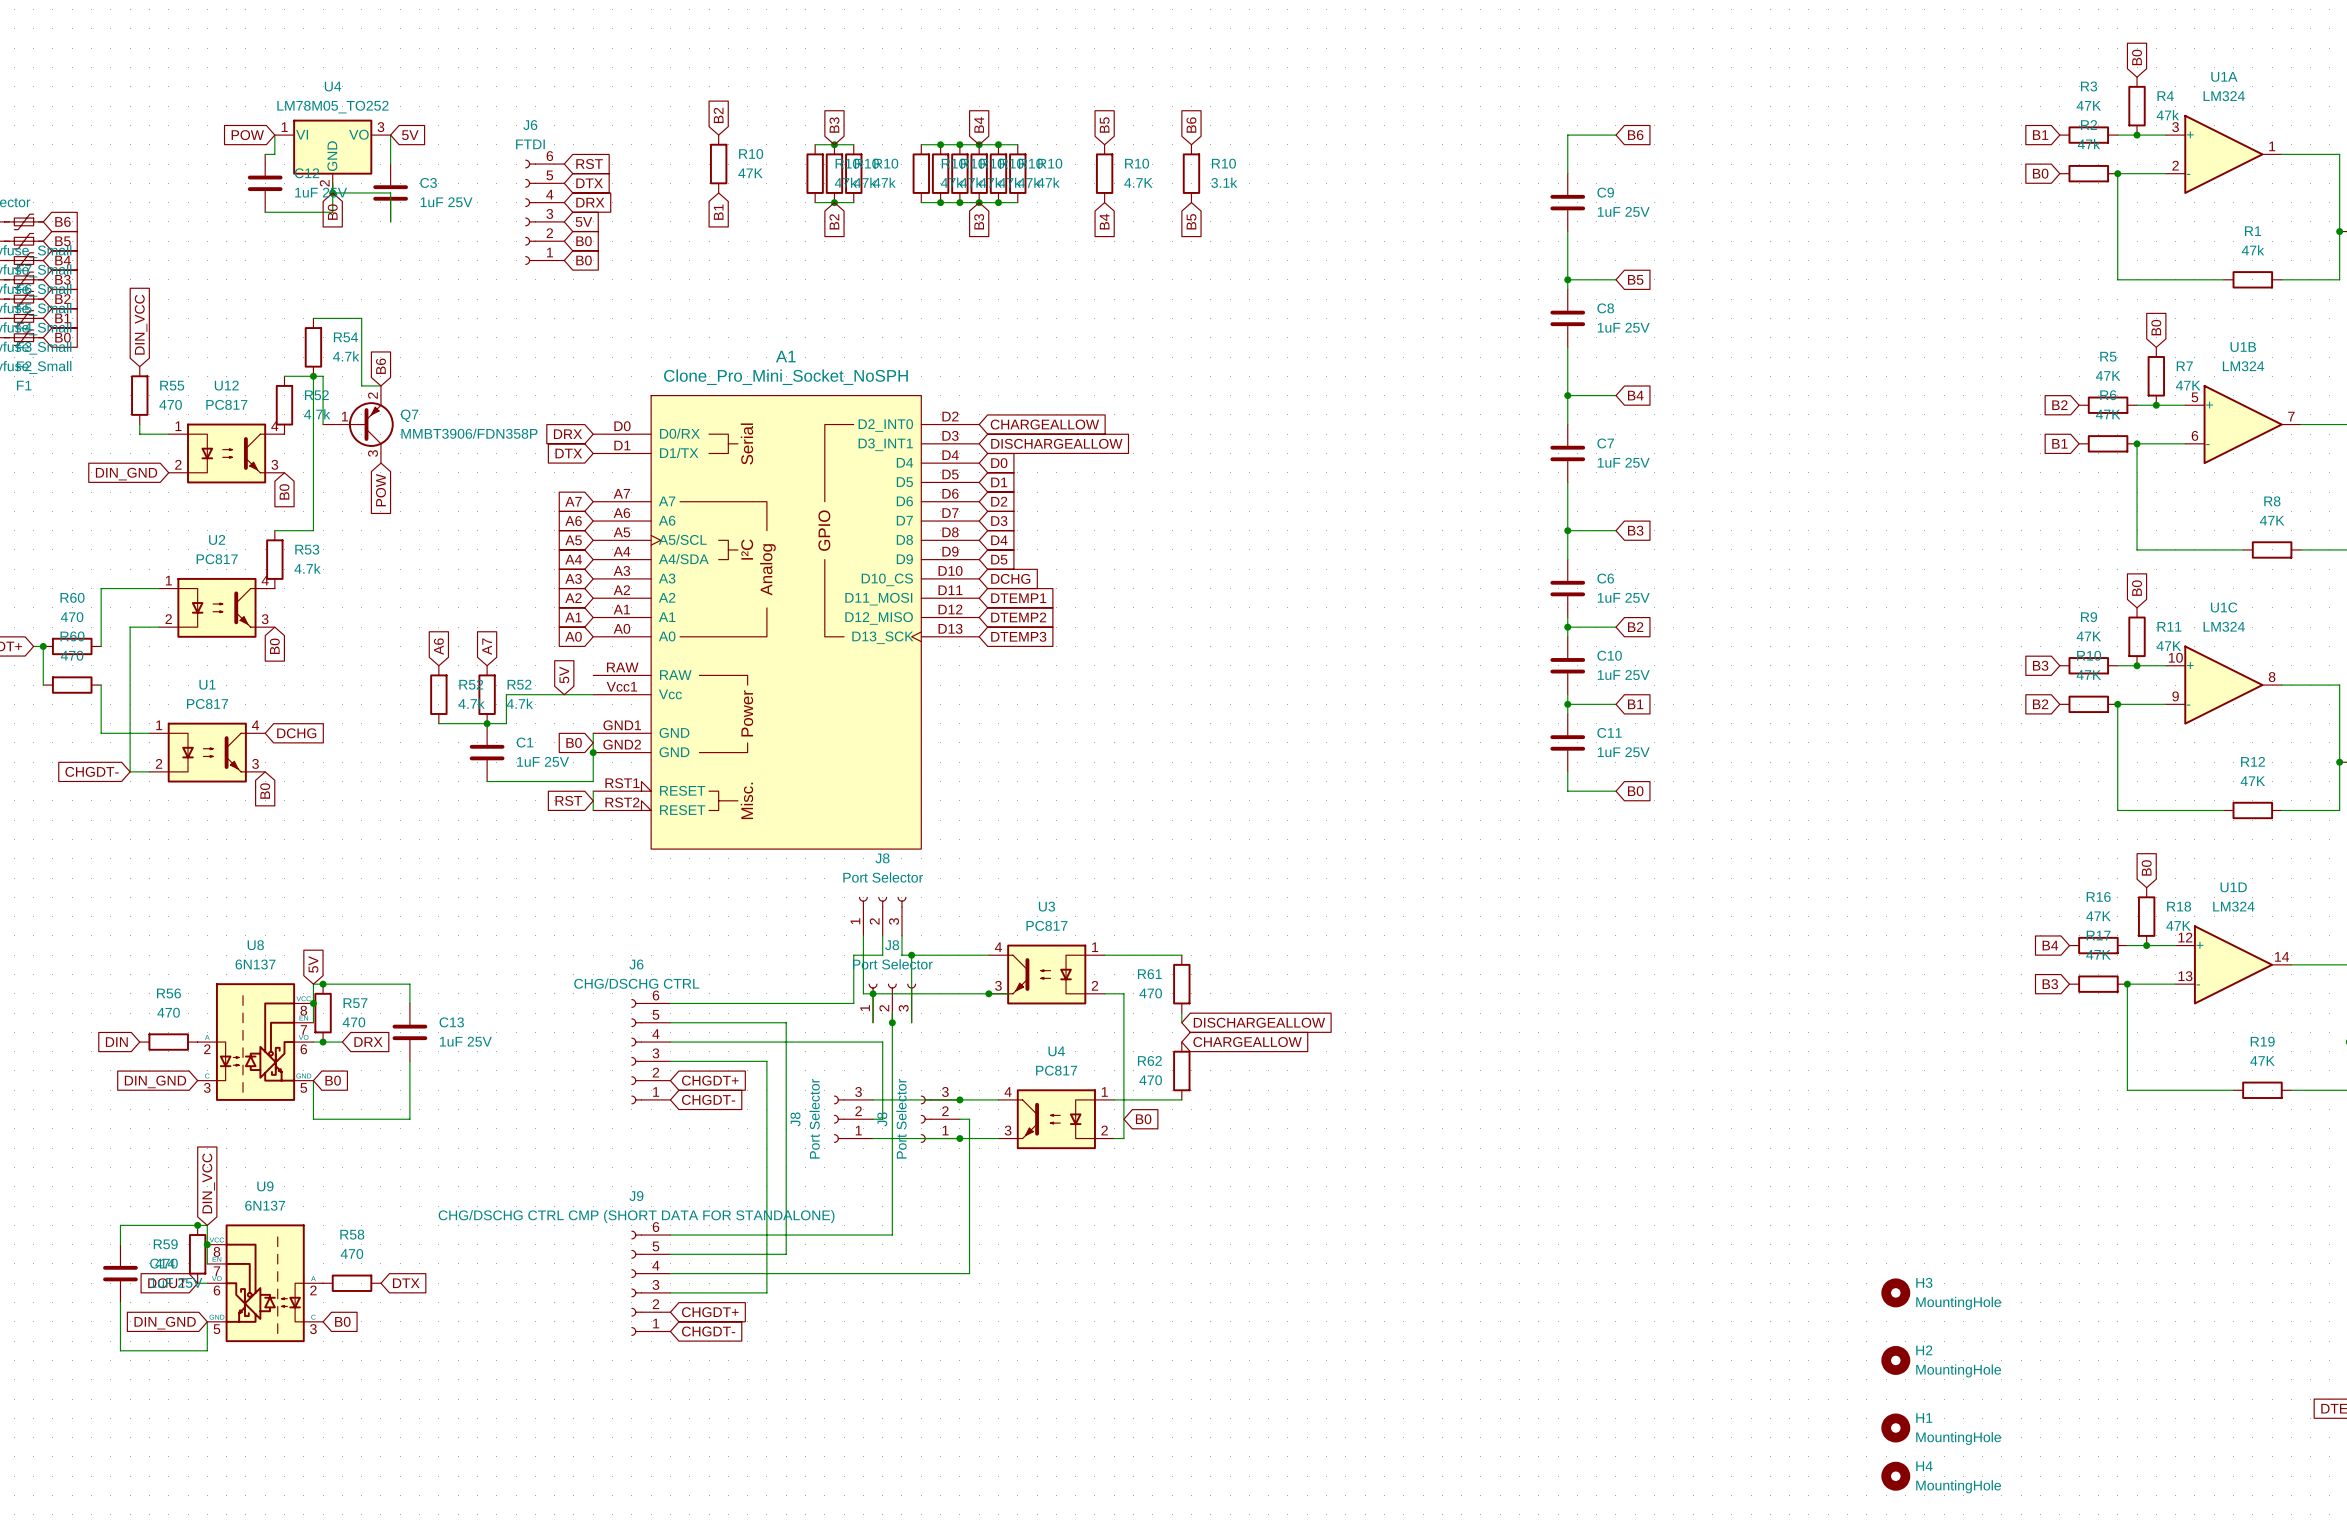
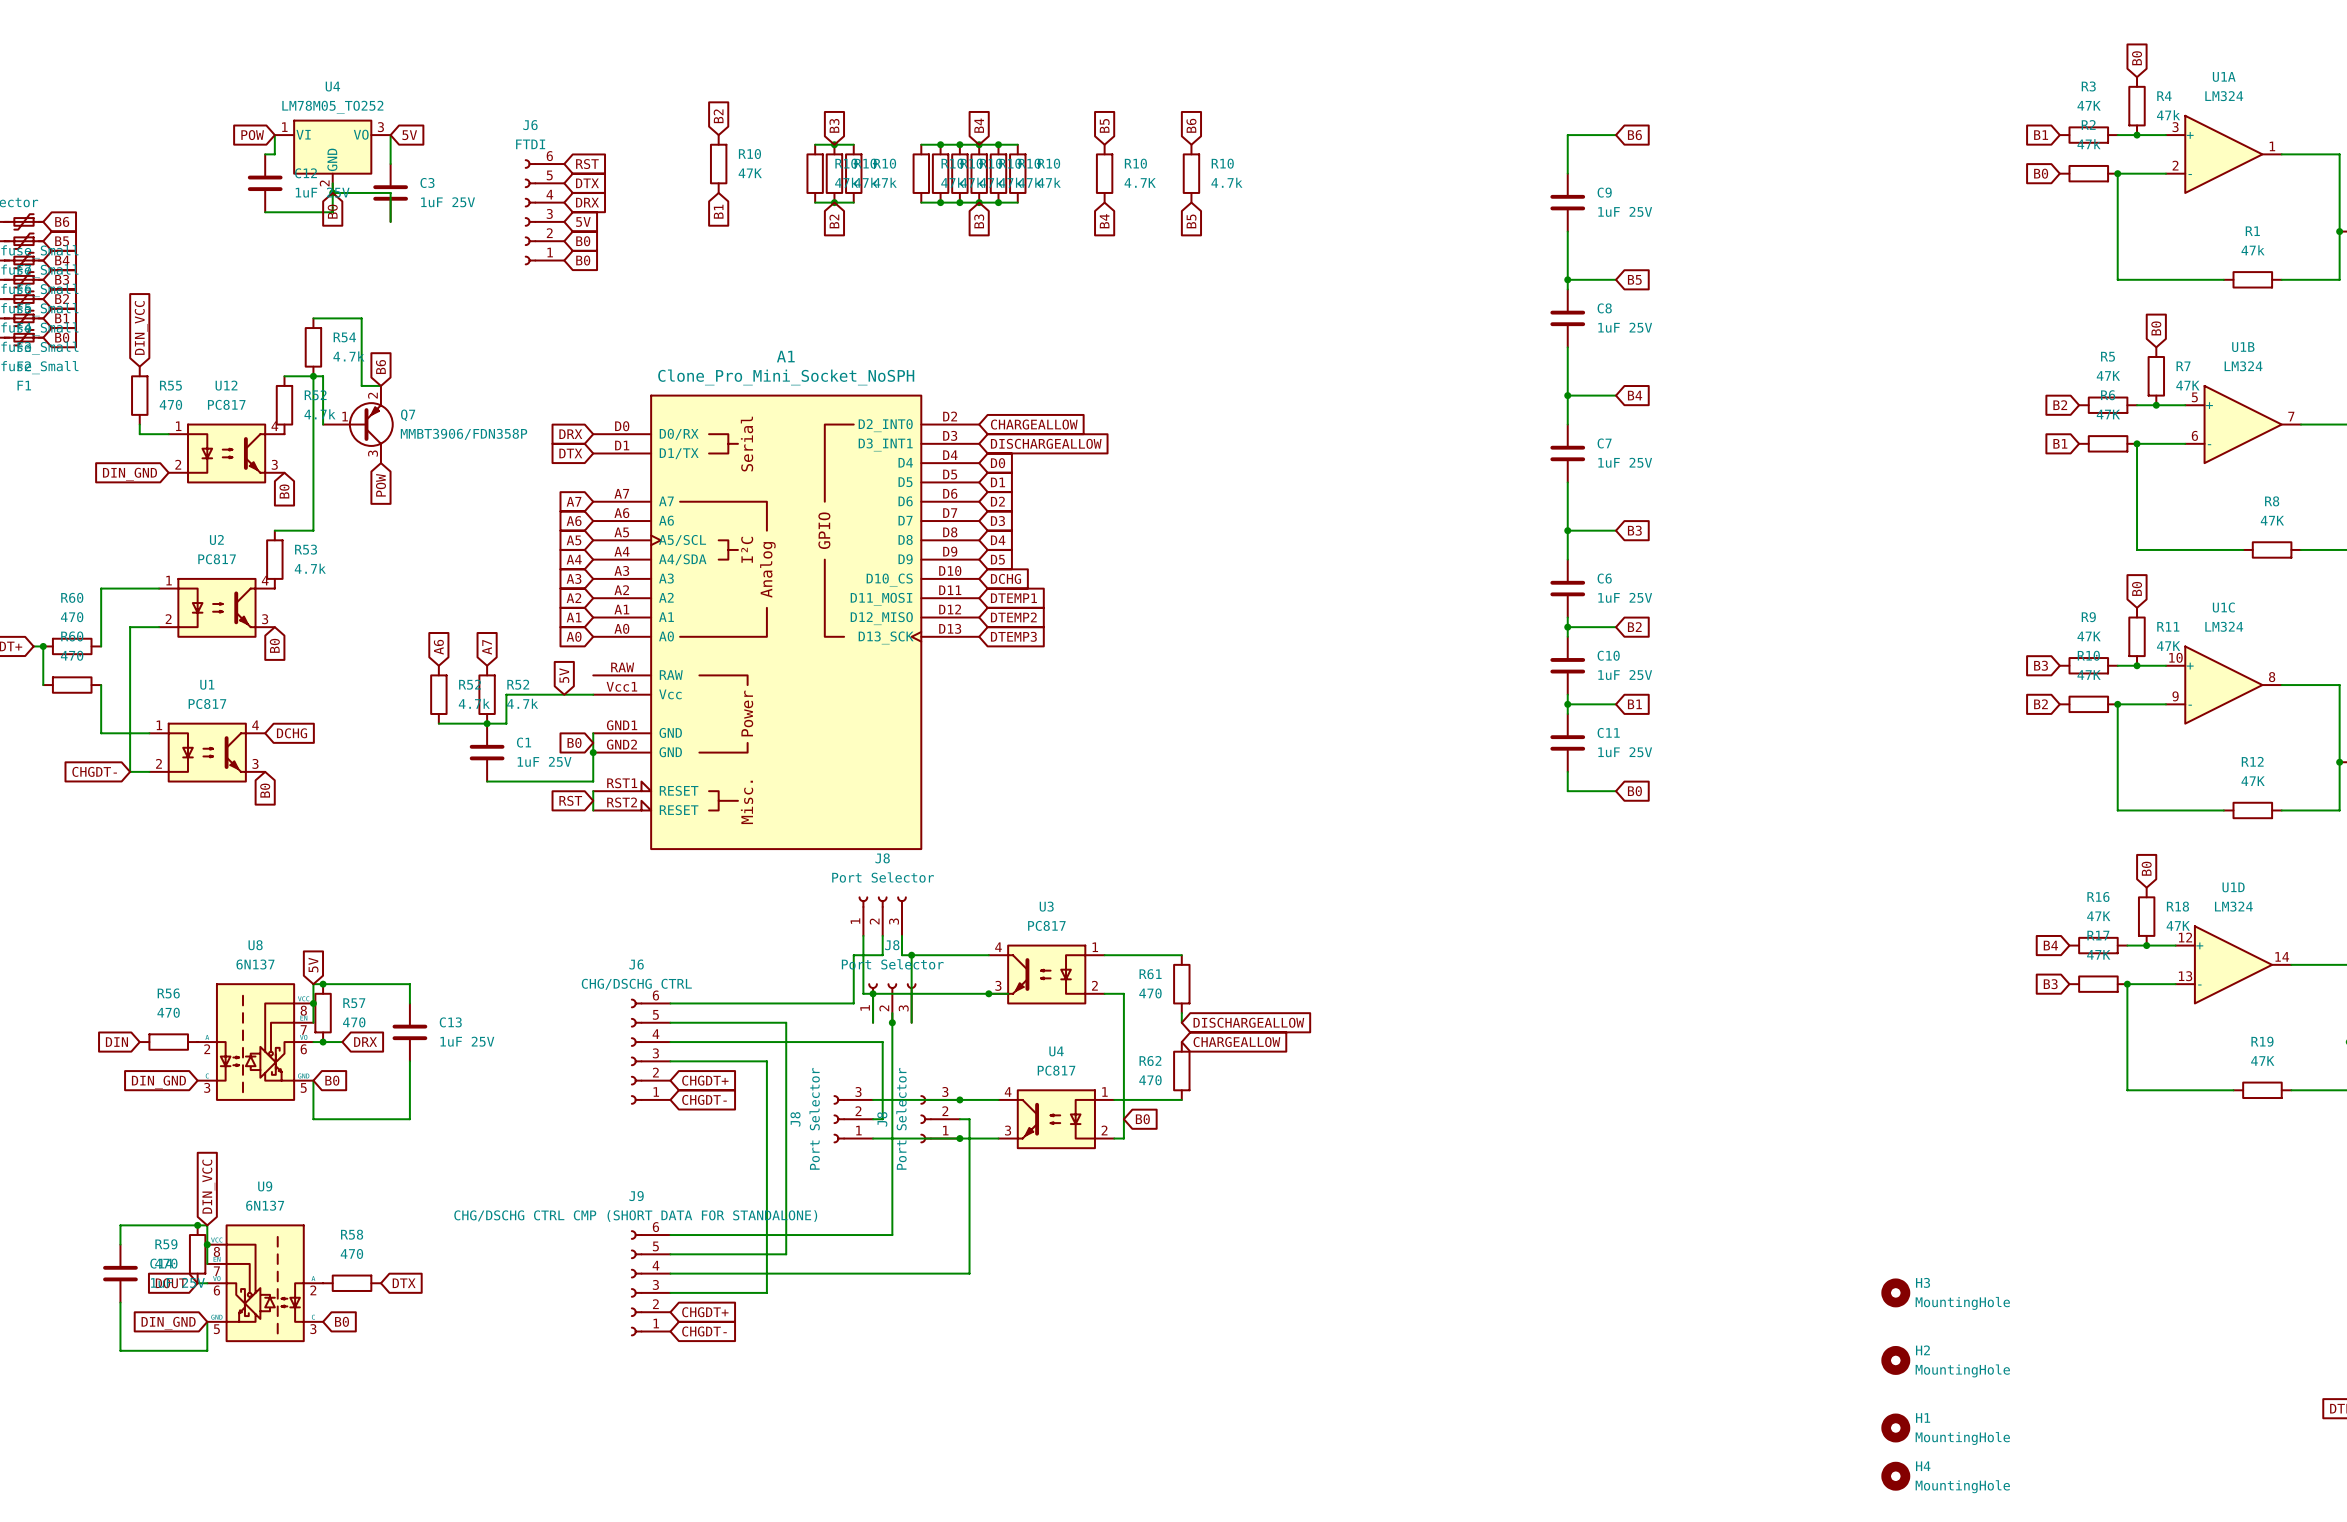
R10 value: 3.1k (1224, 182) -> 4.7k (1226, 182)

